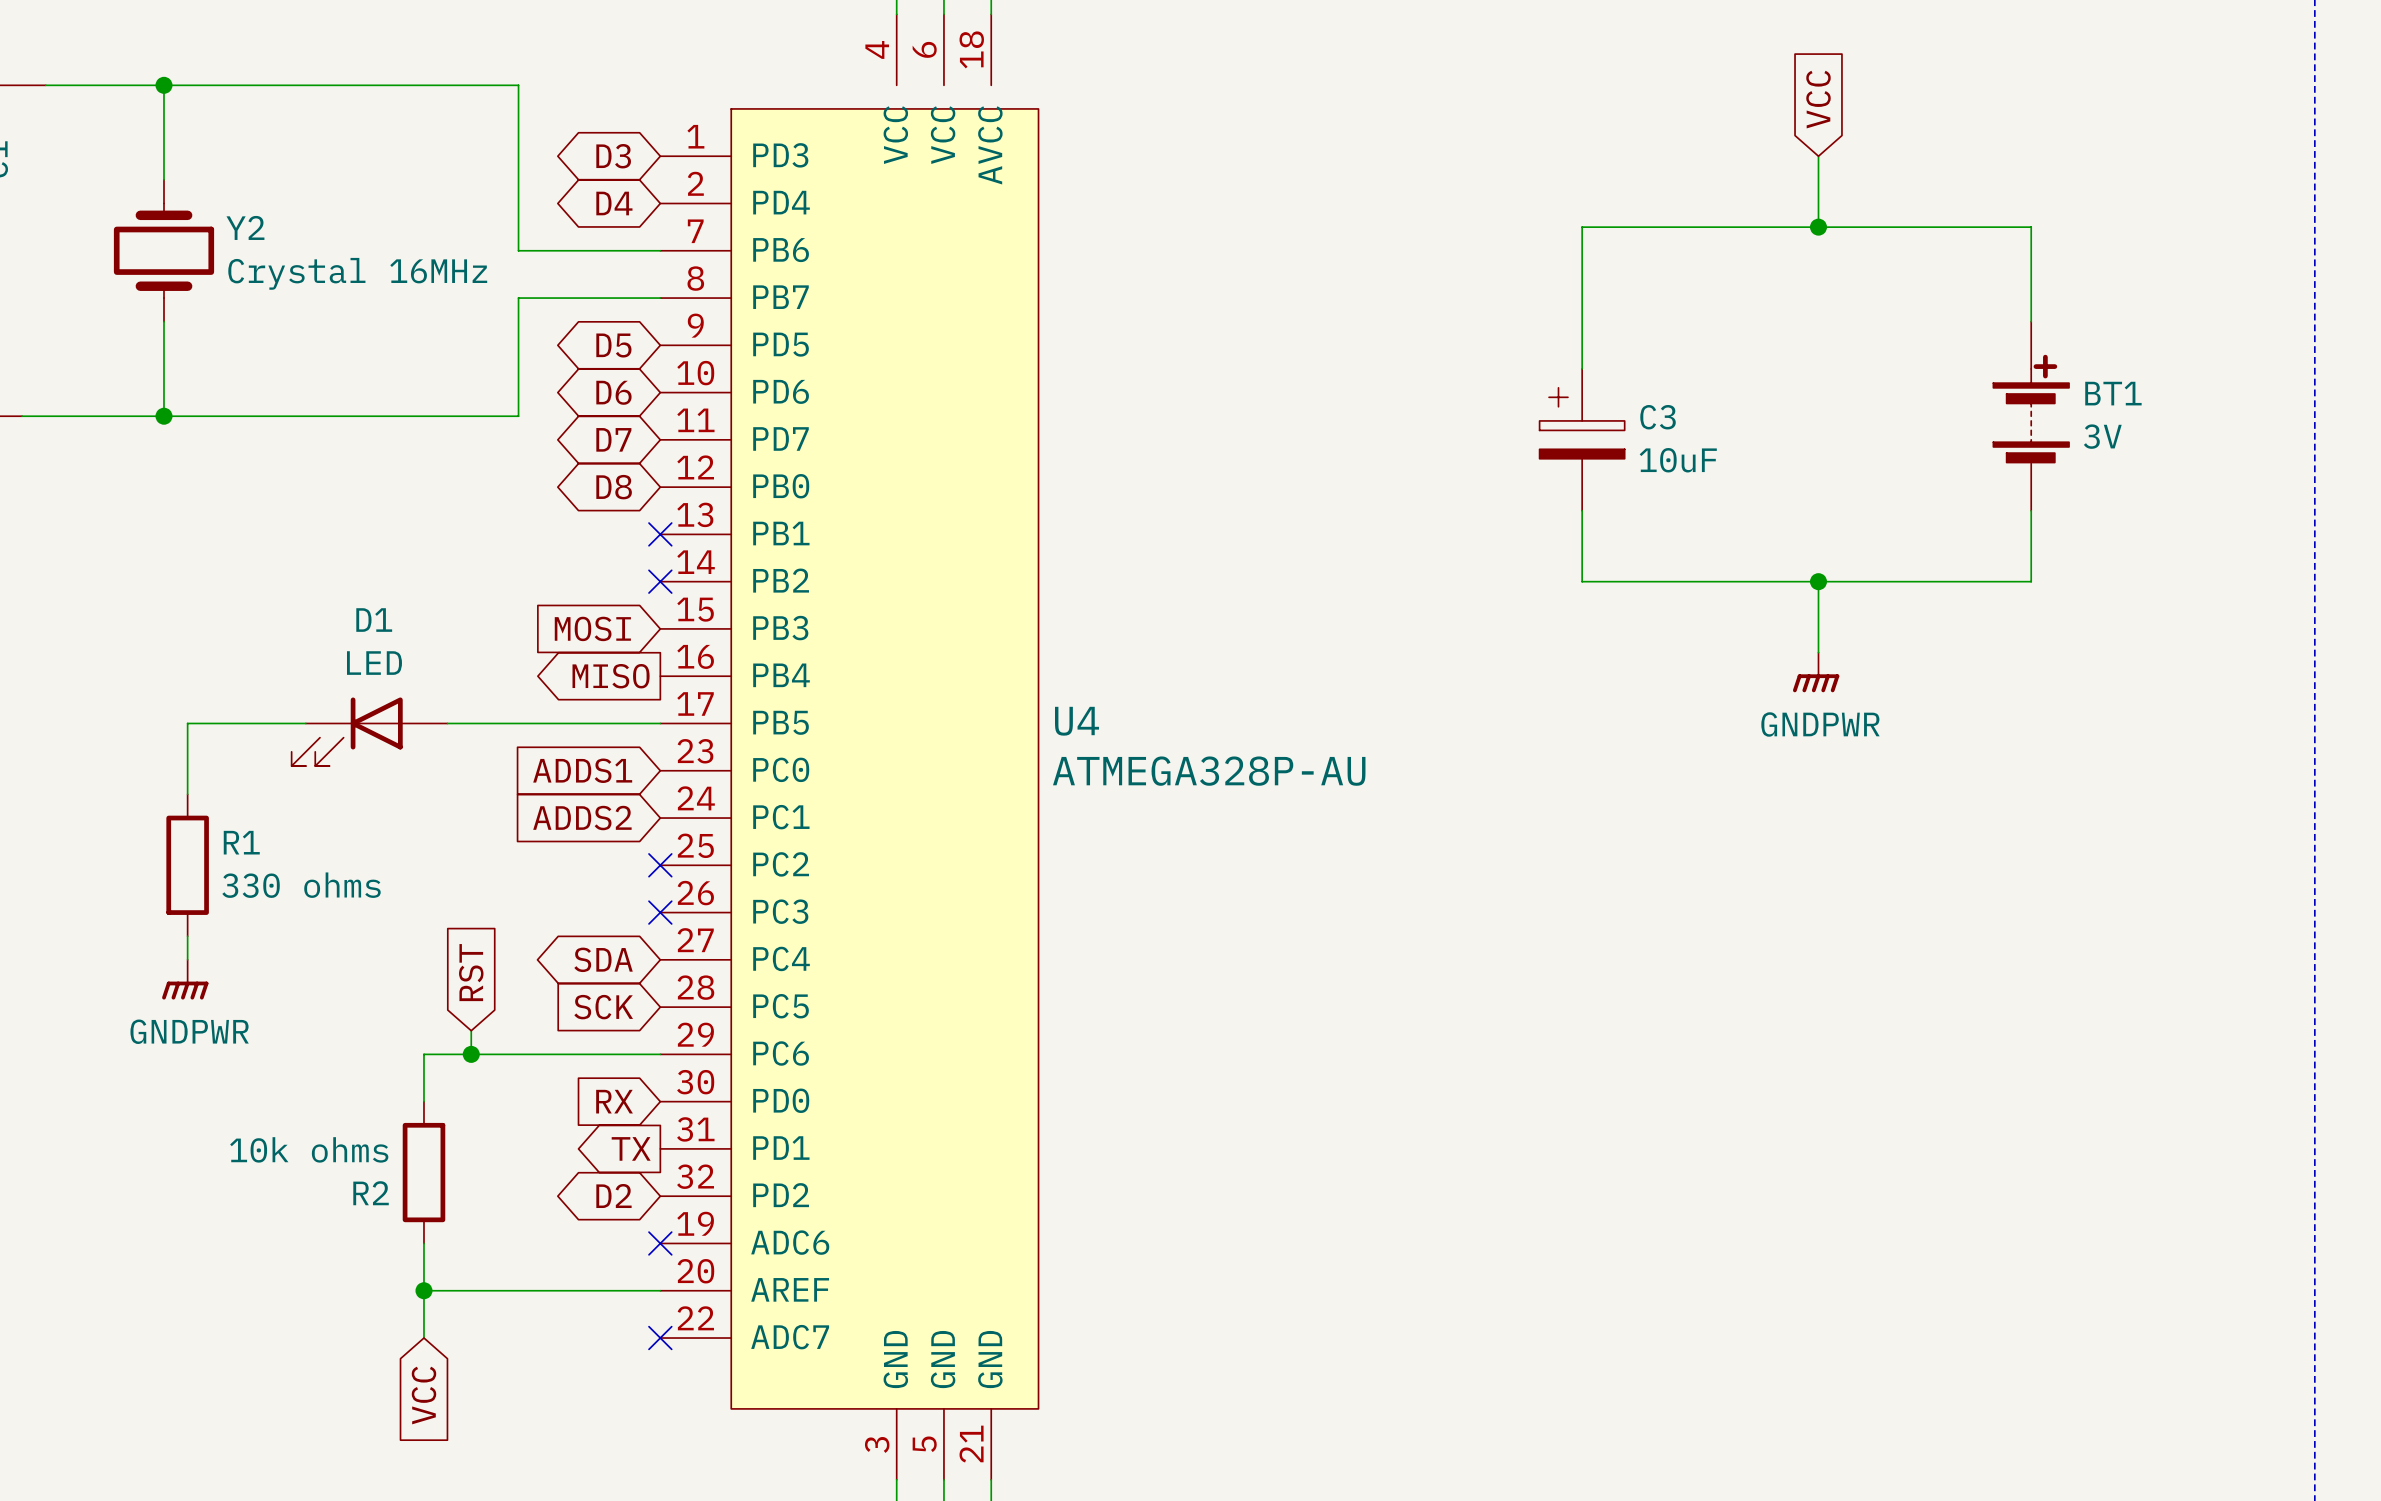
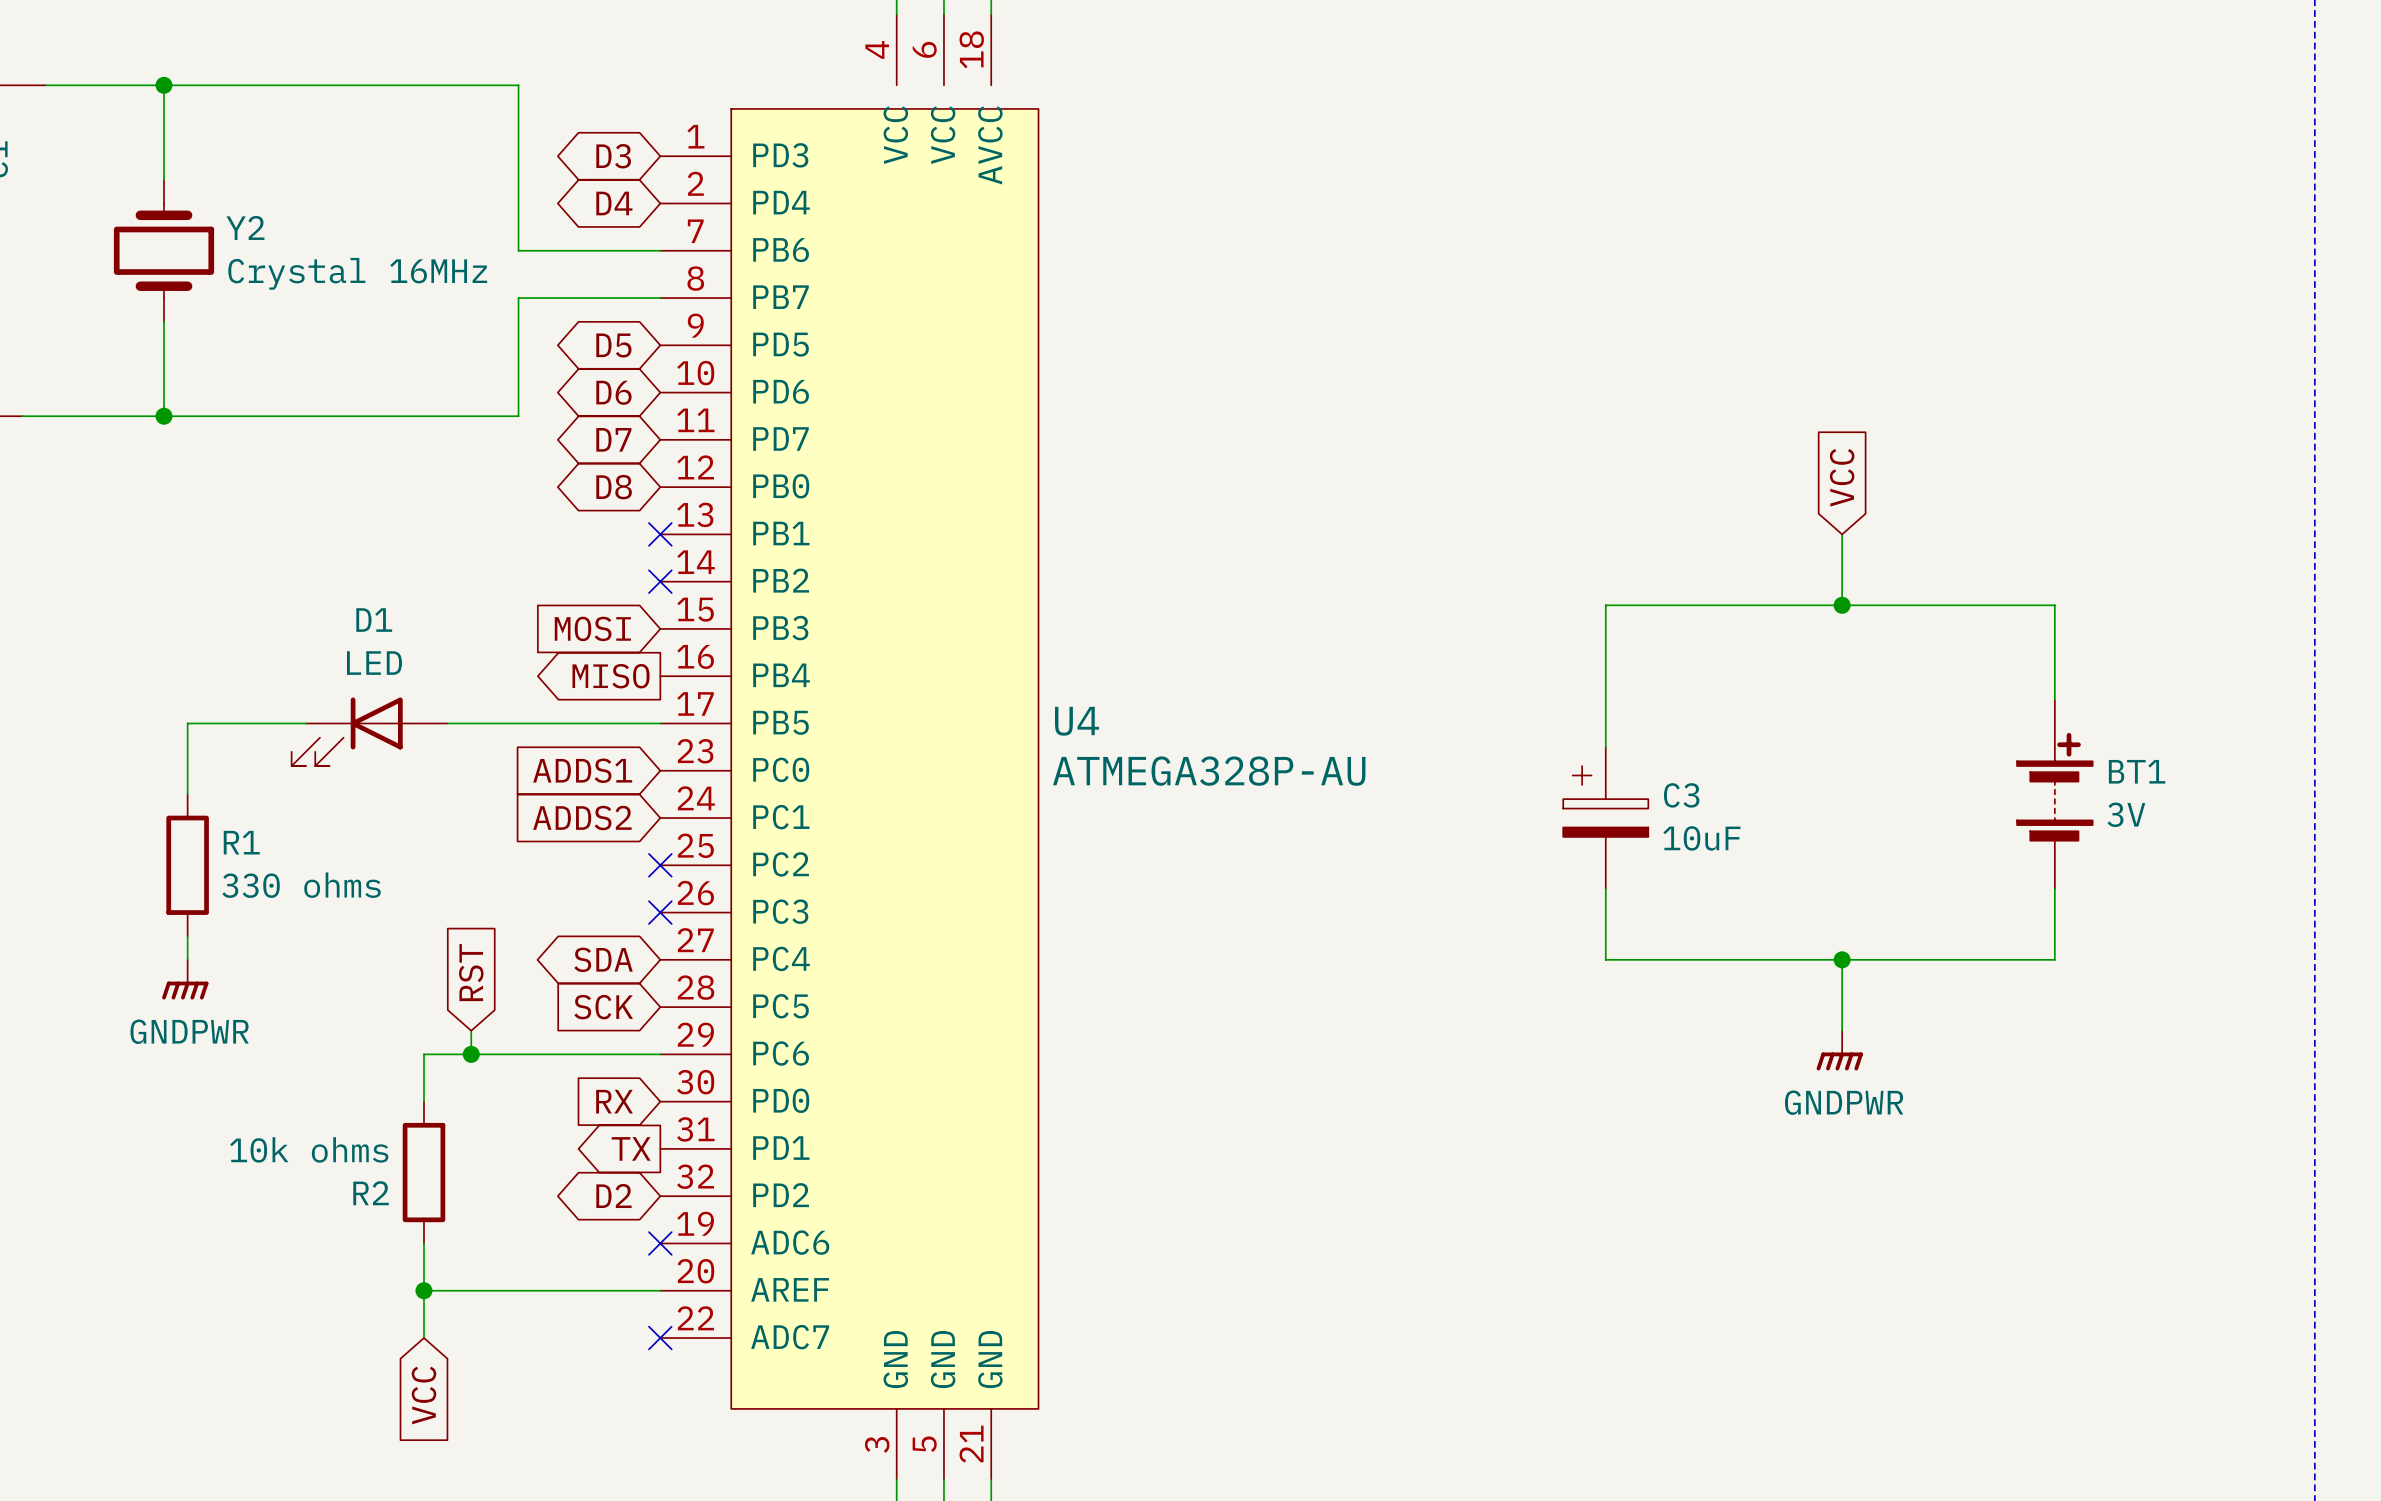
global label position: VCC (1818, 99) -> VCC (1842, 477)
wire: (1818, 156) (1818, 227) -> none
junction: (1818, 227) -> none
wire: (2031, 321) (2031, 227) (1582, 227) (1582, 368) -> (2054, 699) (2054, 605) (1605, 605) (1605, 747)
BT1 position: (2031, 416) -> (2054, 794)
C3 position: (1582, 439) -> (1605, 818)
wire: (1582, 510) (1582, 581) (2031, 581) (2031, 510) -> (1605, 888) (1605, 959) (2054, 959) (2054, 888)
wire: (1818, 581) (1818, 652) -> (1842, 534) (1842, 605)
junction position: (1818, 581) -> (1842, 605)
power symbol position: GNDPWR (1816, 672) -> GNDPWR (1839, 1050)
wire: none -> (1842, 959) (1842, 1030)
junction: none -> (1842, 959)

